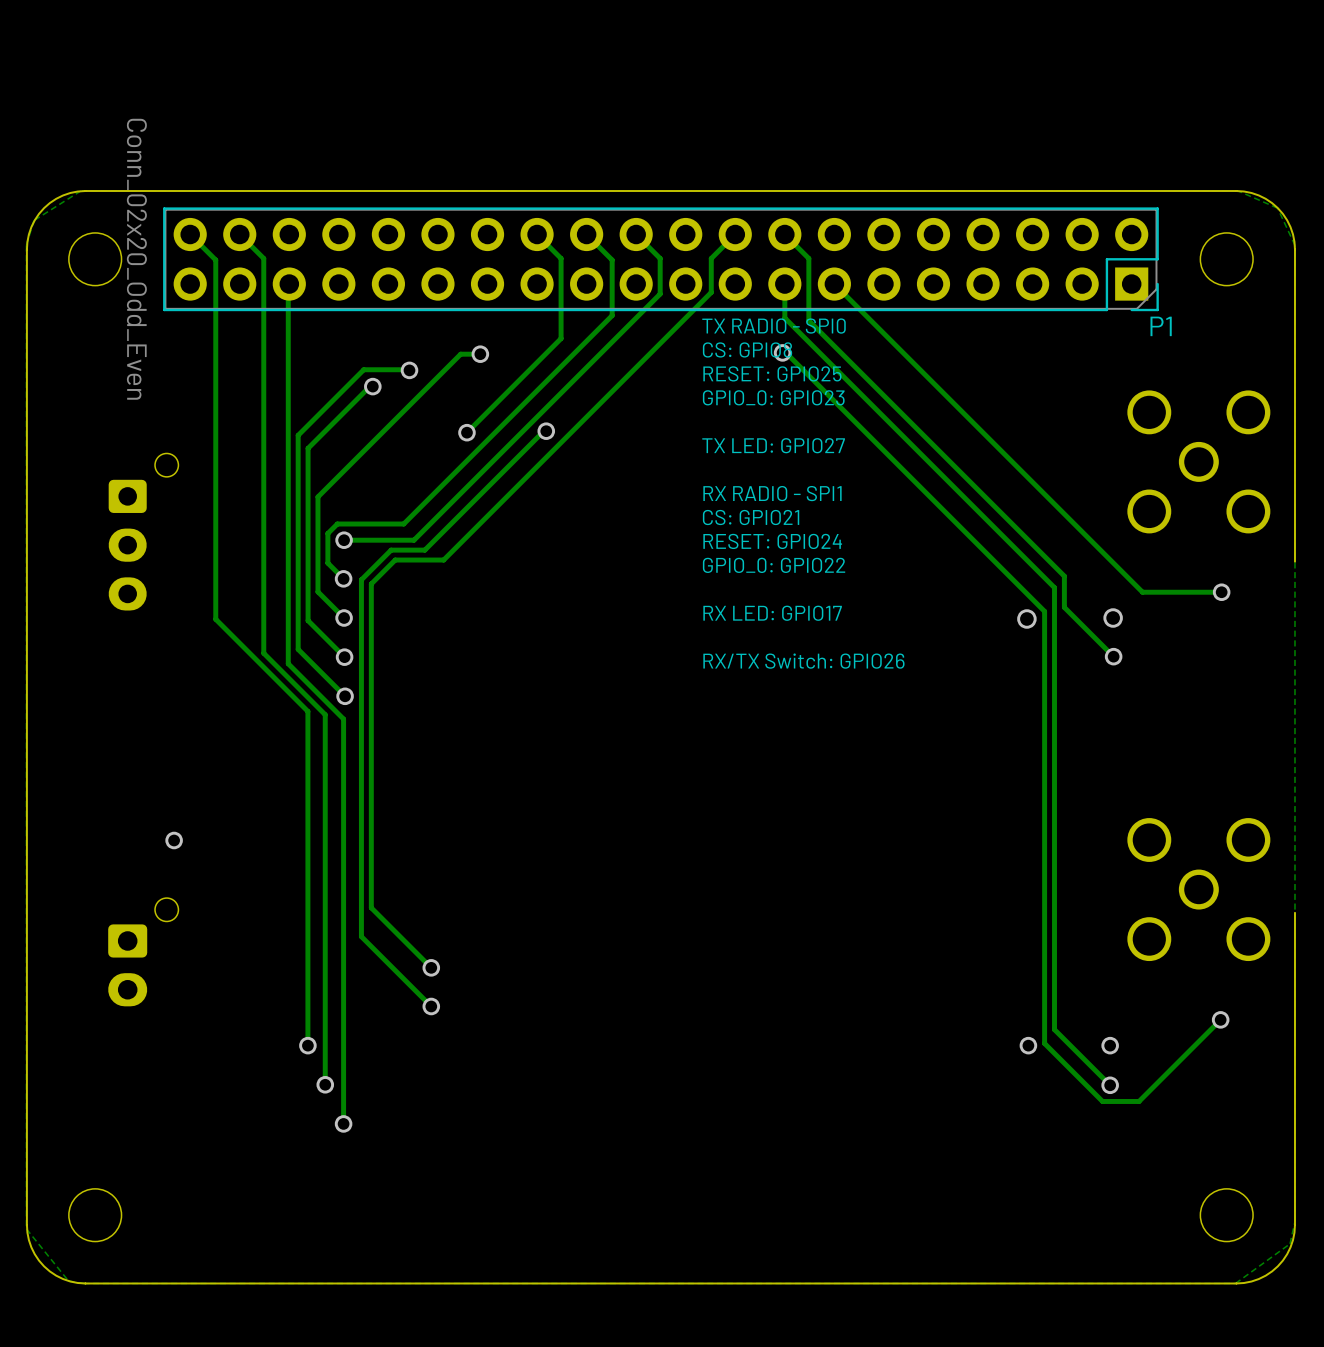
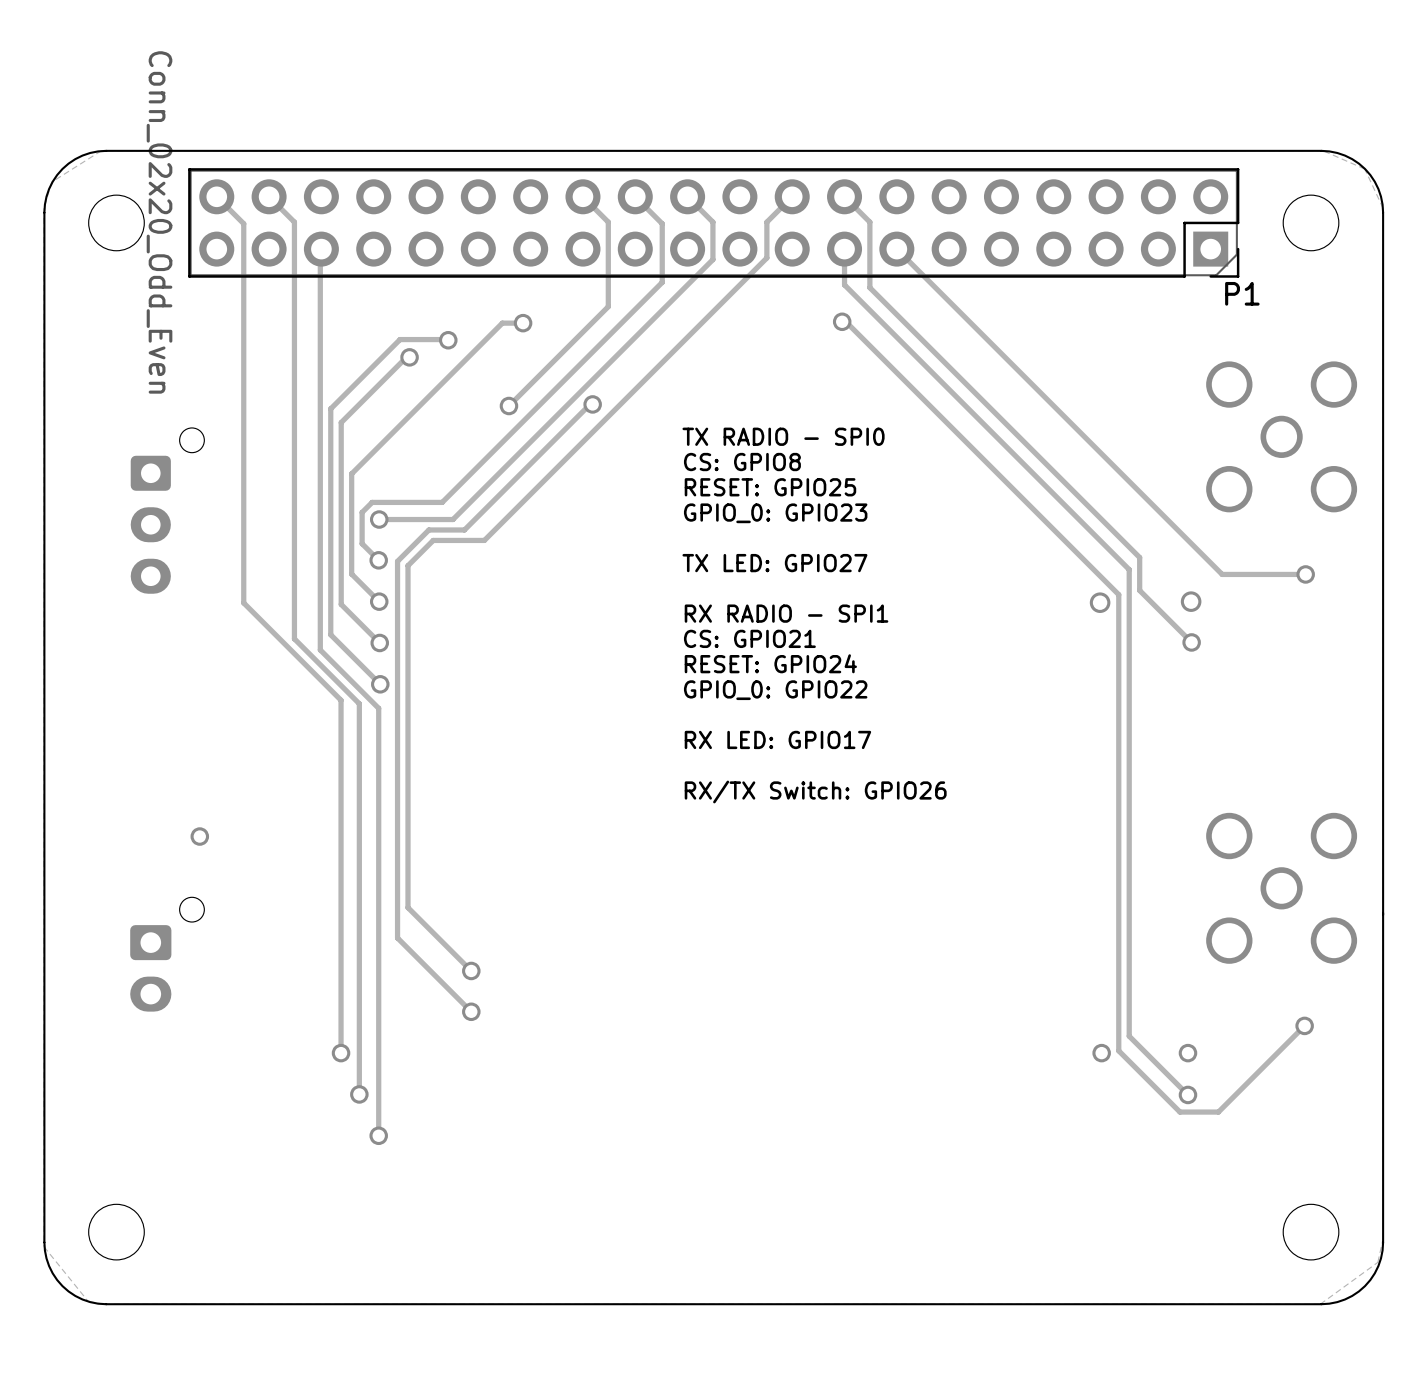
text position: TX RADIO - SPI0 (774, 326) -> TX RADIO - SPI0 (783, 436)
text position: CS: GPIO8 (747, 349) -> CS: GPIO8 (742, 462)
text position: RESET: GPIO25 (772, 373) -> RESET: GPIO25 (770, 487)
text position: GPIO_0: GPIO23 (773, 397) -> GPIO_0: GPIO23 (775, 513)
text position: TX LED: GPIO27 (773, 445) -> TX LED: GPIO27 (774, 563)
text position: RX RADIO - SPI1 (772, 493) -> RX RADIO - SPI1 (786, 613)
text position: CS: GPIO21 (751, 517) -> CS: GPIO21 (749, 638)
text position: RESET: GPIO24 (772, 541) -> RESET: GPIO24 (770, 663)
board edge: none -> (1383, 542) (1383, 912)
text position: GPIO_0: GPIO22 (774, 565) -> GPIO_0: GPIO22 (775, 690)
text position: RX LED: GPIO17 (772, 613) -> RX LED: GPIO17 (777, 739)
text position: RX/TX Switch: GPIO26 (803, 661) -> RX/TX Switch: GPIO26 (815, 791)

